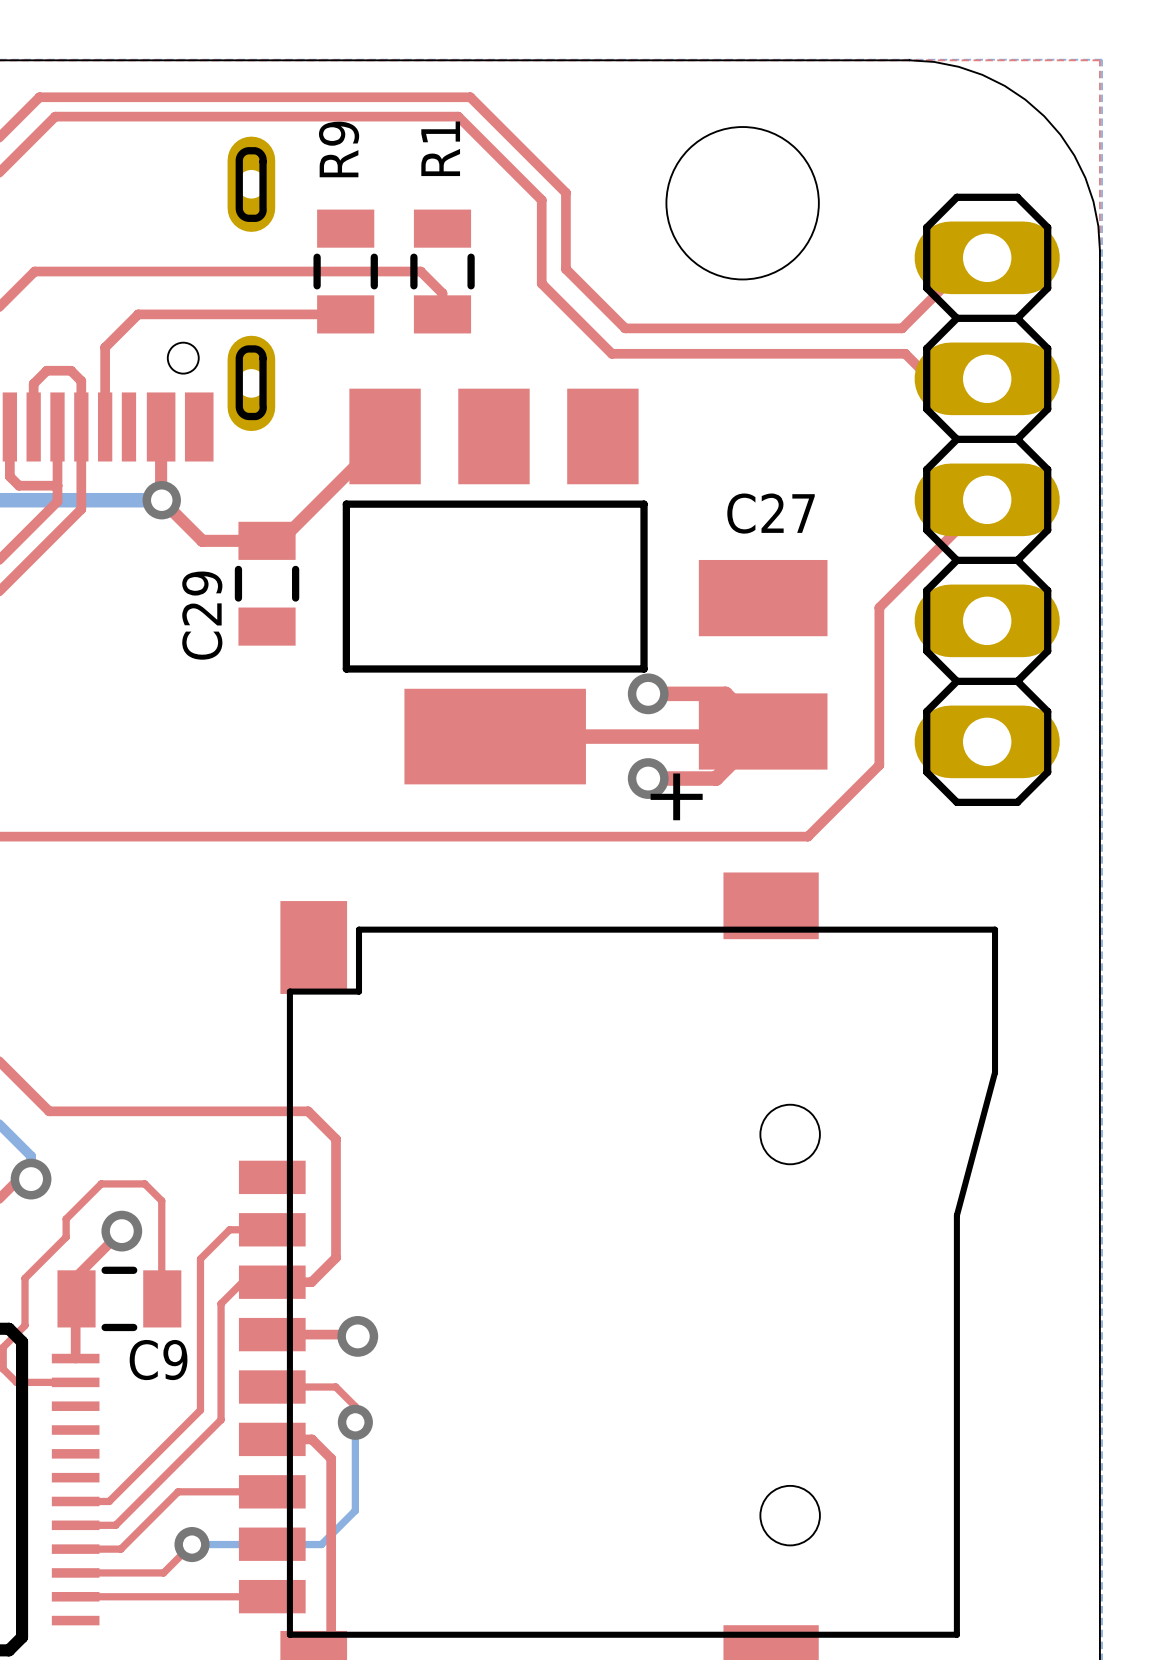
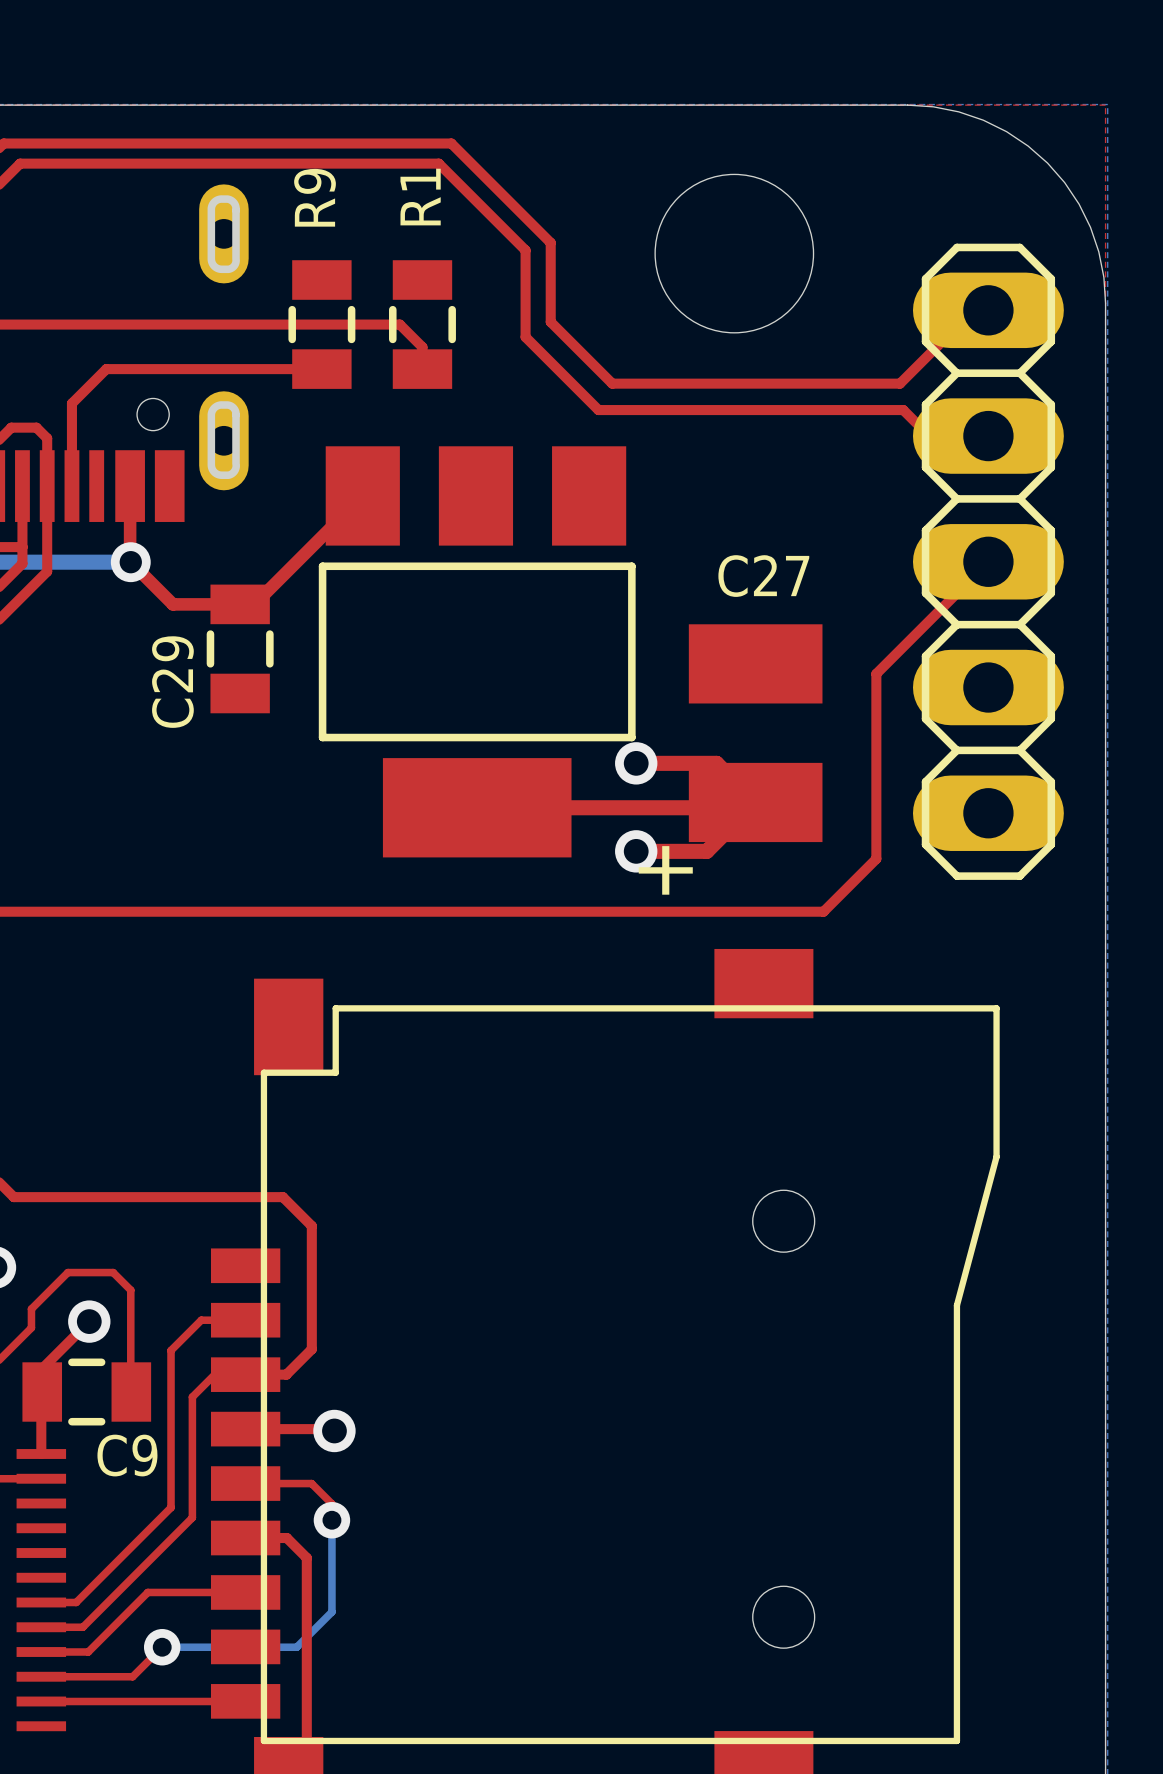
top track: (879, 765) (807, 836) -> (876, 837) (876, 858) (823, 911) (802, 911)

